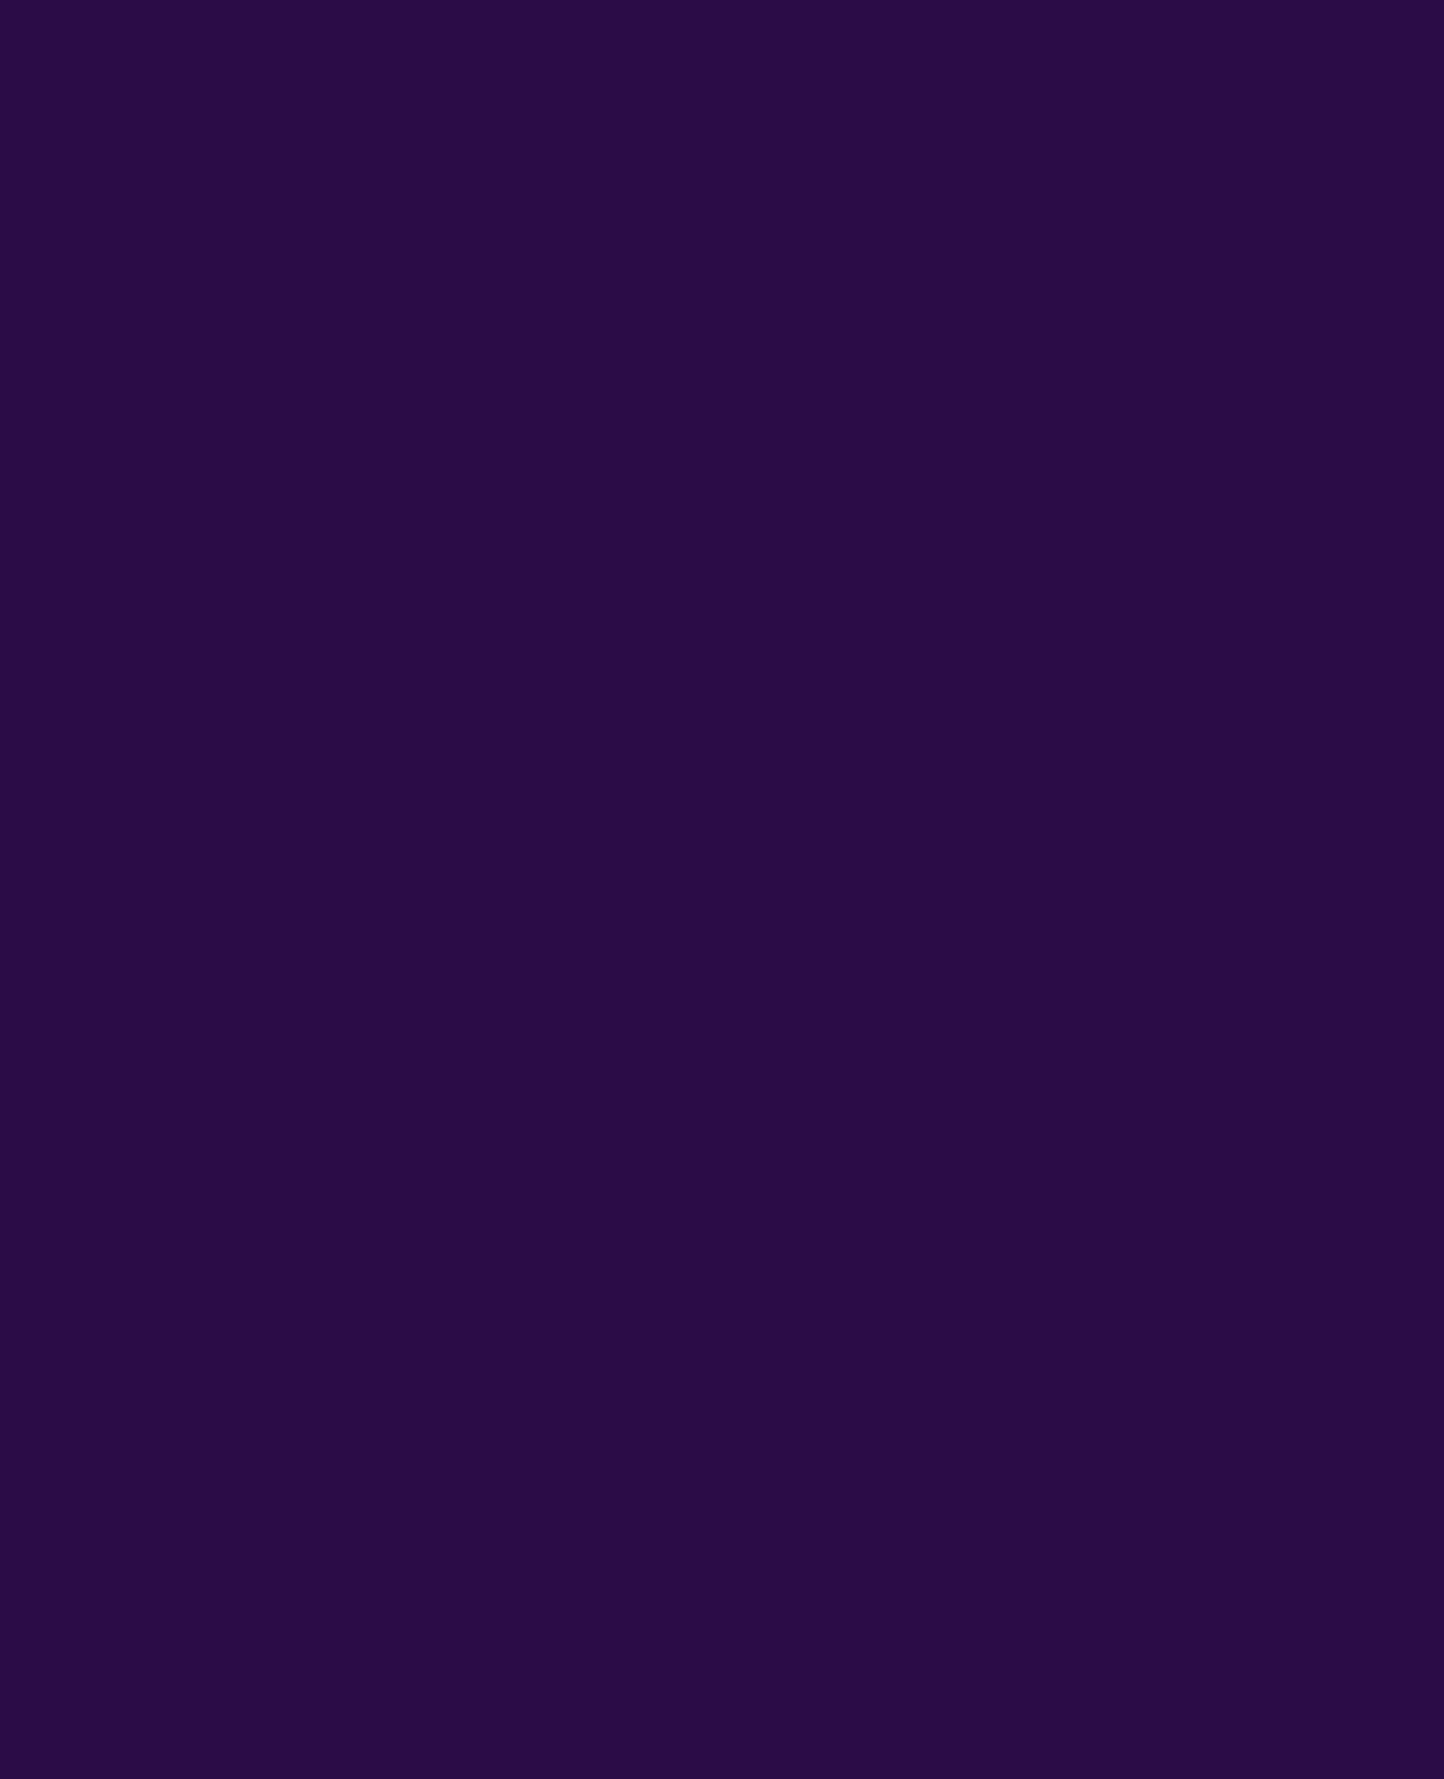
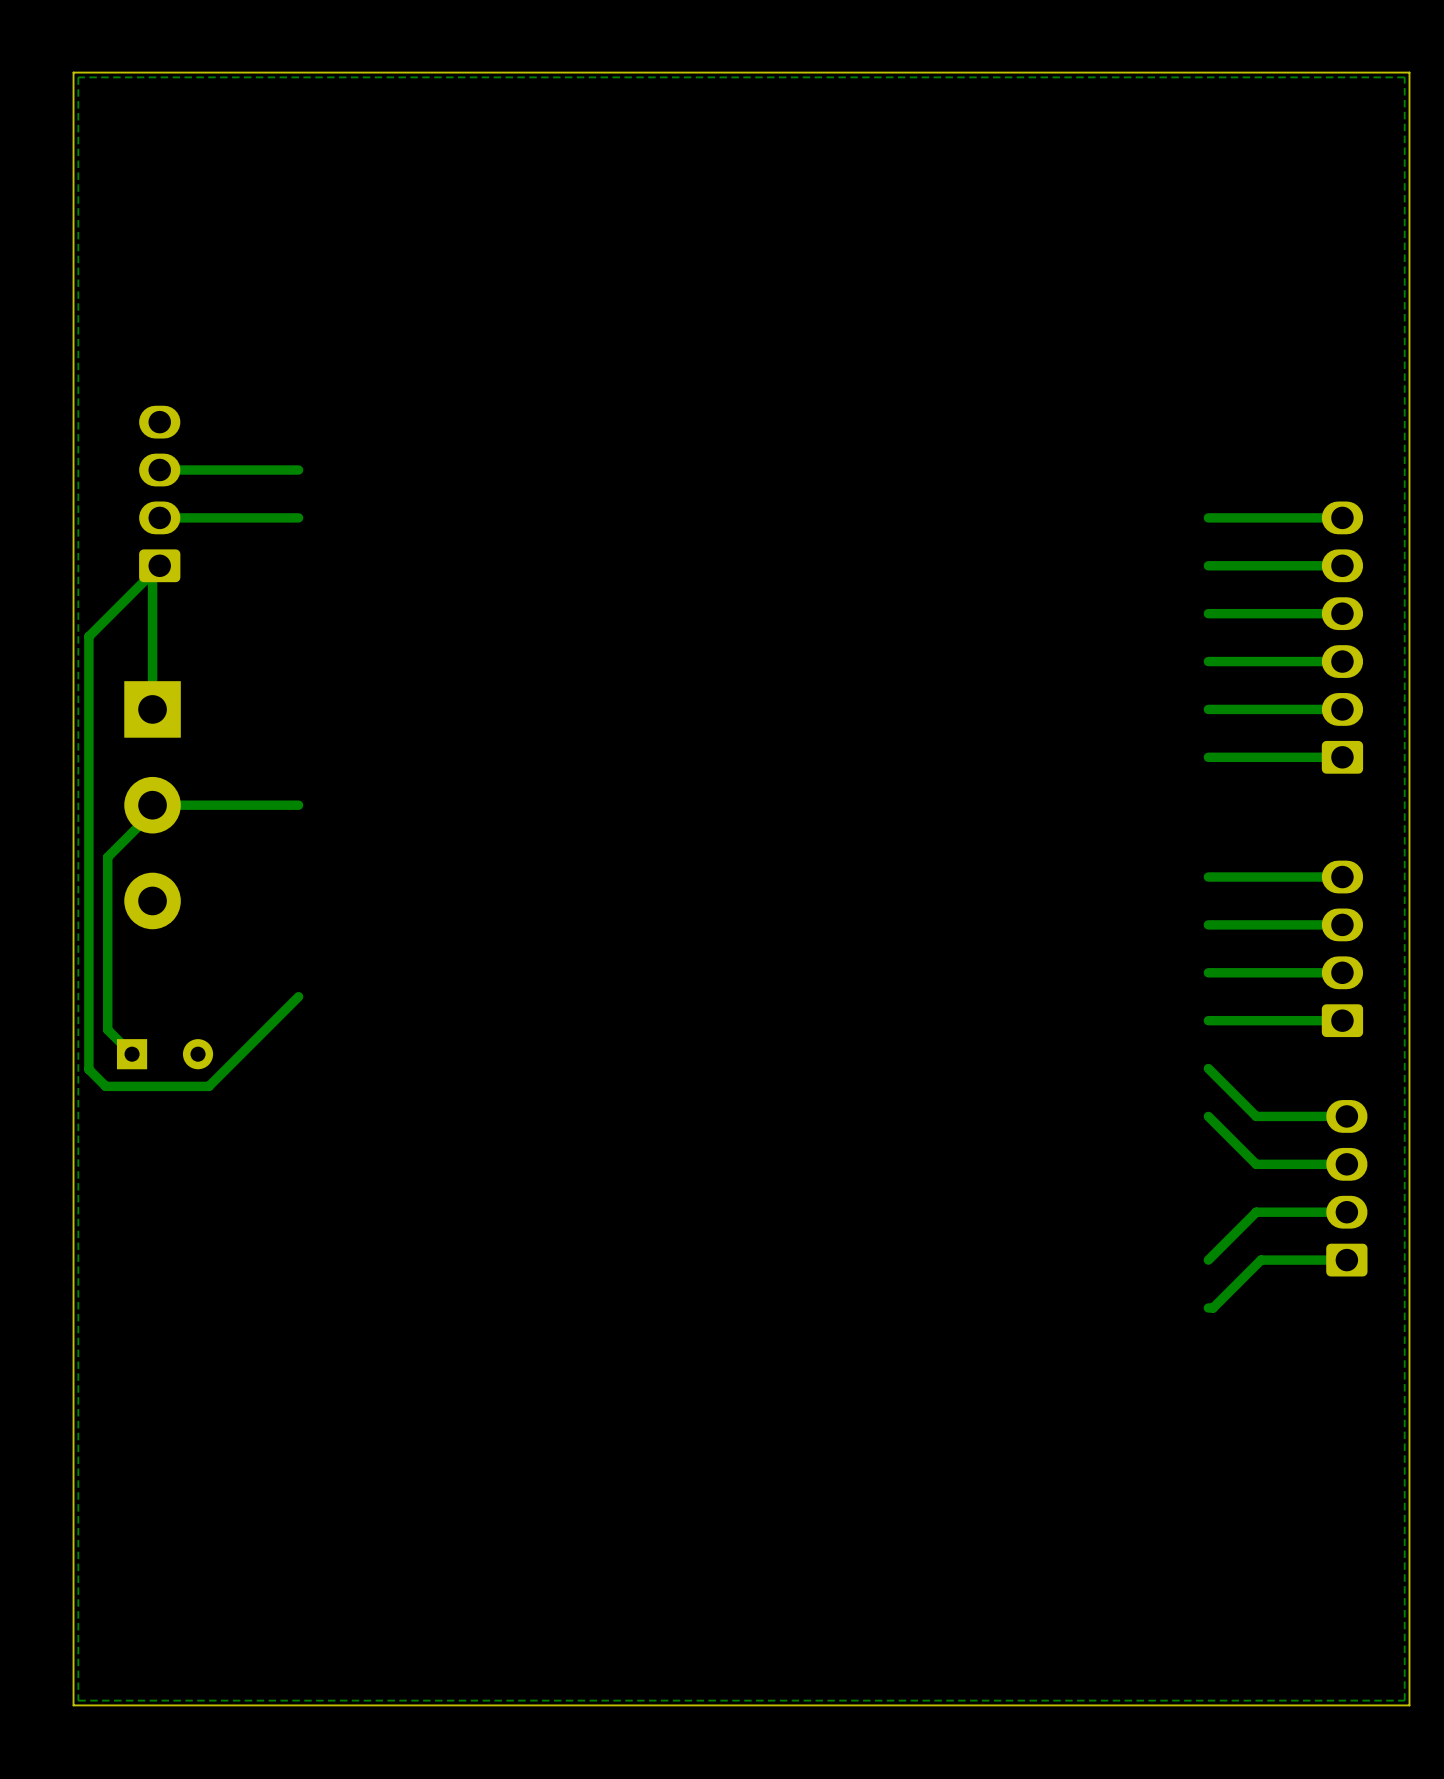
board edge: none -> (1409, 72) (73, 72) (73, 1705) (1409, 1705) (1409, 72)
zone outline: none -> (1404, 77) (78, 77) (78, 1700) (1404, 1700) (1404, 77)
track: none -> (298, 470) (159, 470)
part: none -> (159, 493)
track: none -> (298, 517) (159, 517)
track: none -> (1342, 517) (1208, 517)
track: none -> (159, 565) (88, 636) (88, 1069) (105, 1086) (208, 1086) (298, 996)
track: none -> (1342, 565) (1208, 565)
track: none -> (152, 572) (152, 709)
track: none -> (1342, 613) (1208, 613)
part: none -> (1342, 637)
track: none -> (1342, 661) (1208, 661)
track: none -> (1342, 709) (1208, 709)
track: none -> (1342, 757) (1208, 757)
part: none -> (152, 805)
track: none -> (298, 805) (159, 805) (107, 857) (107, 1029) (132, 1054)
track: none -> (1342, 877) (1208, 877)
track: none -> (1342, 924) (1208, 924)
part: none -> (1342, 948)
track: none -> (1342, 972) (1208, 972)
track: none -> (1342, 1020) (1208, 1020)
part: none -> (165, 1054)
track: none -> (1208, 1068) (1256, 1116) (1346, 1116)
track: none -> (1208, 1116) (1256, 1164) (1346, 1164)
part: none -> (1346, 1188)
track: none -> (1346, 1212) (1256, 1212) (1208, 1260)
track: none -> (1346, 1260) (1261, 1260) (1213, 1307) (1208, 1307)

